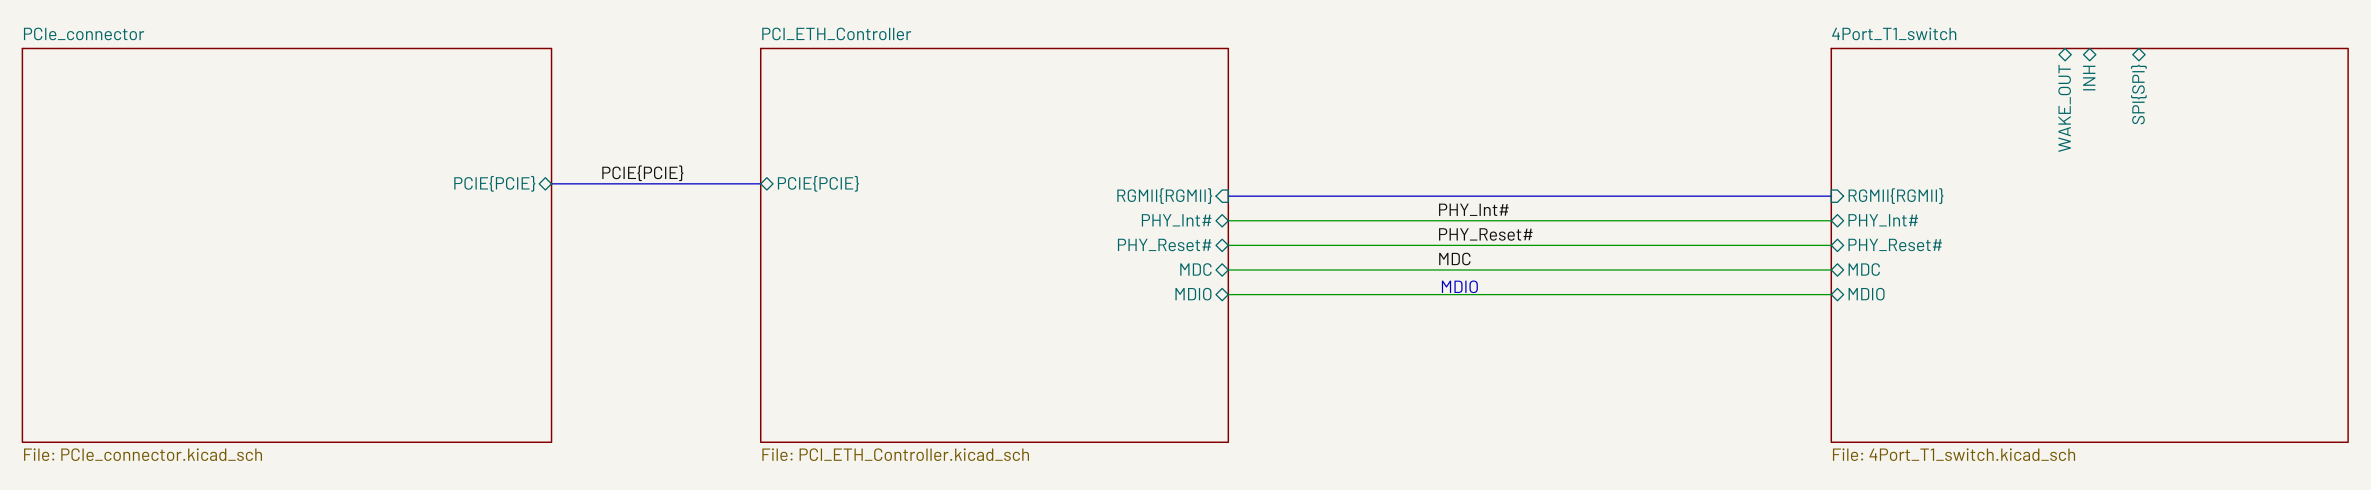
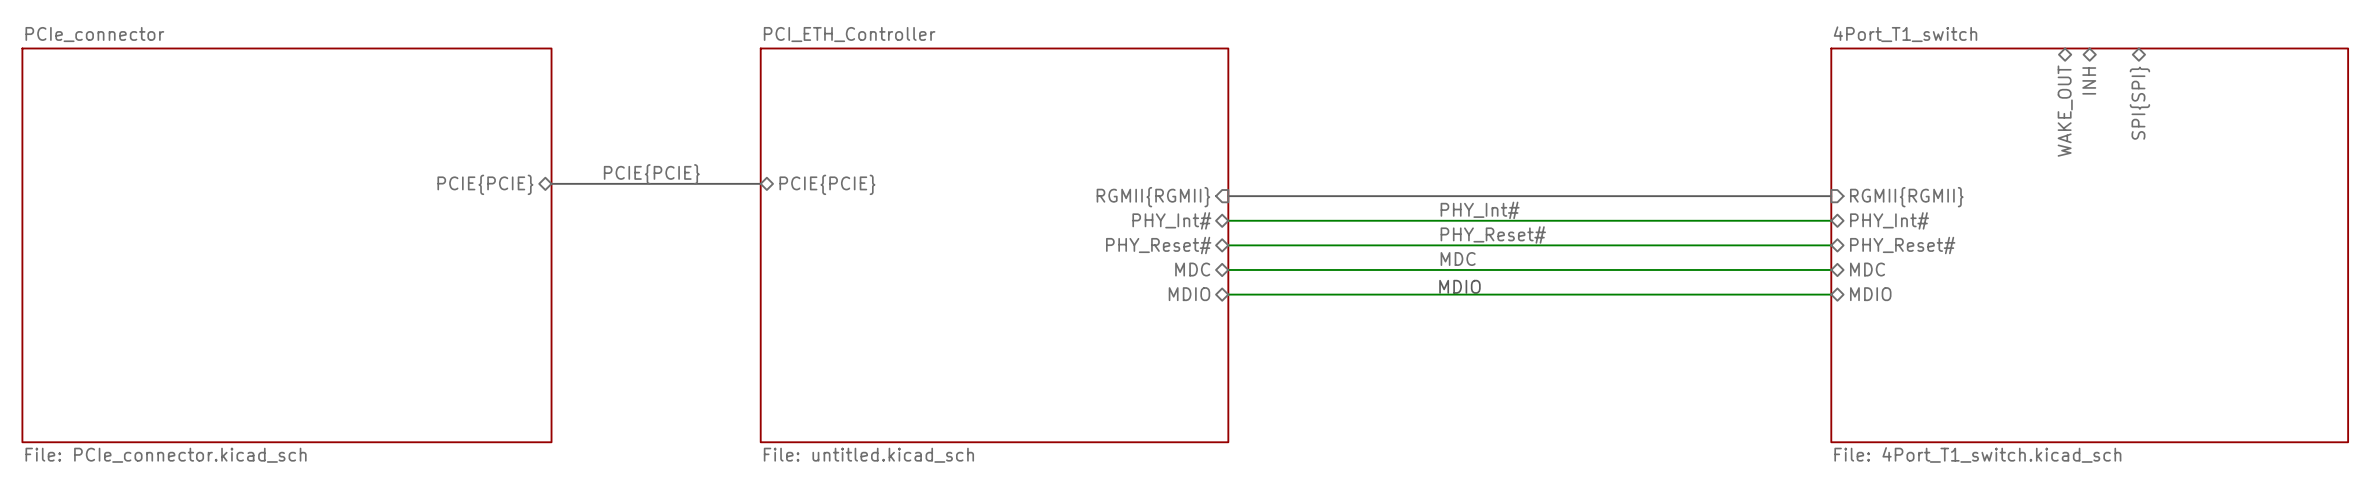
sheet PCI_ETH_Controller value: File: PCI_ETH_Controller.kicad_sch (895, 454) -> File: untitled.kicad_sch (868, 455)

